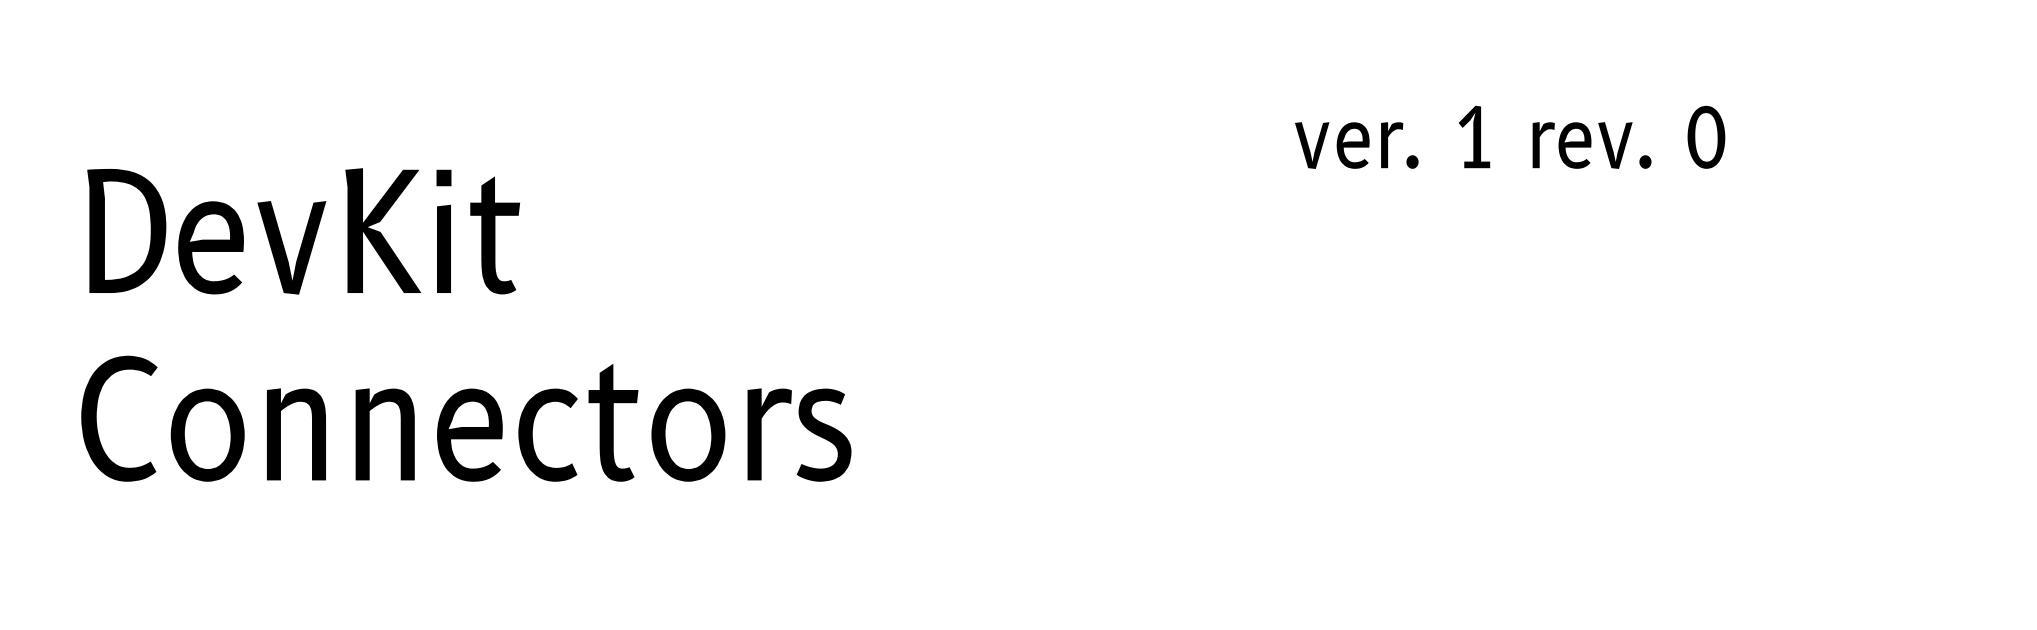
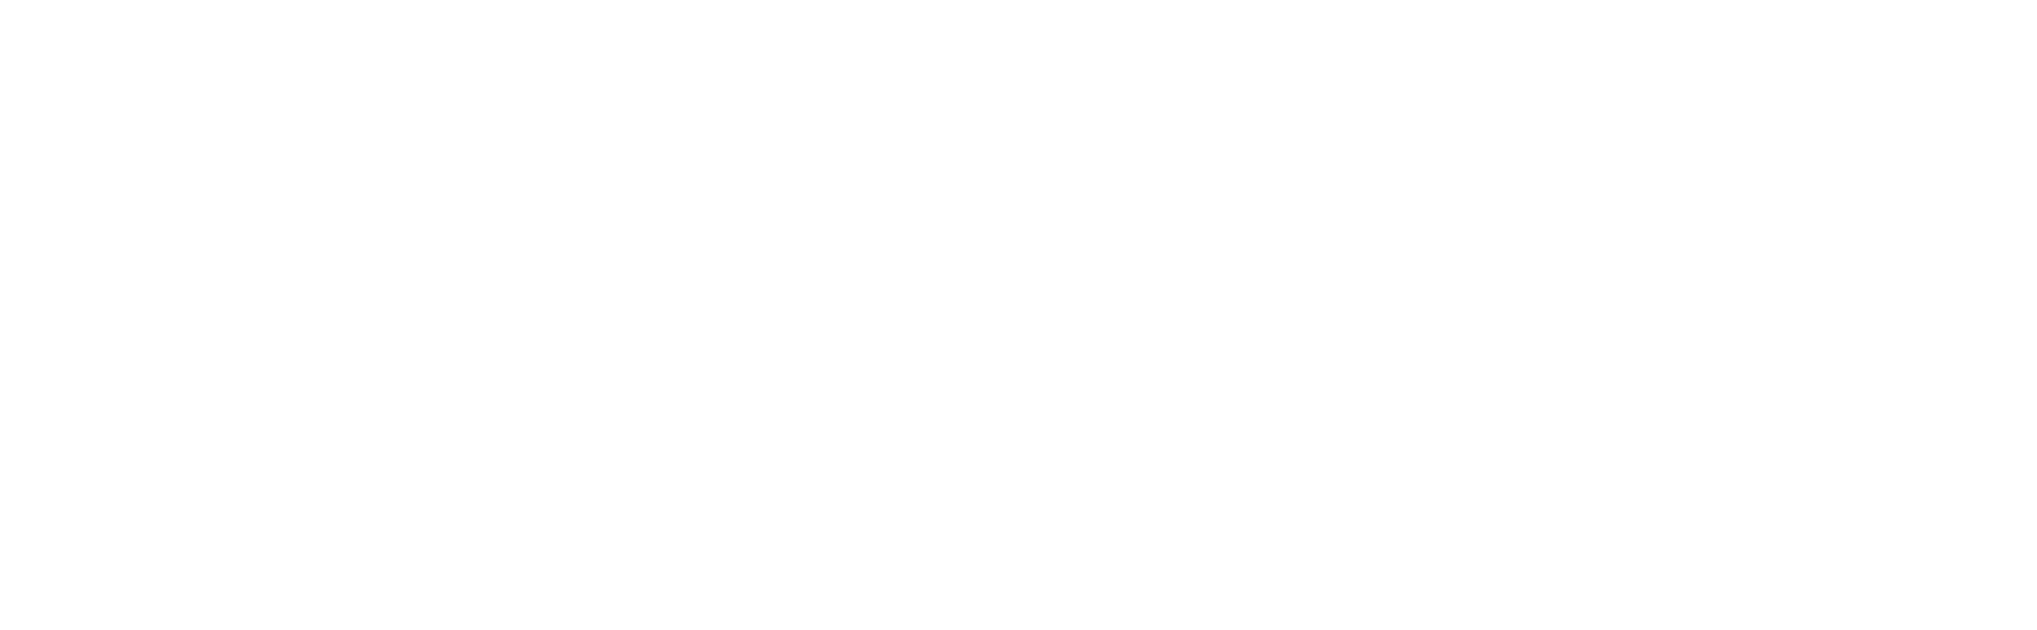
text: ver. 1 rev. 0 (1510, 137) -> none
text: DevKit (303, 231) -> none
text: Connectors (466, 418) -> none

